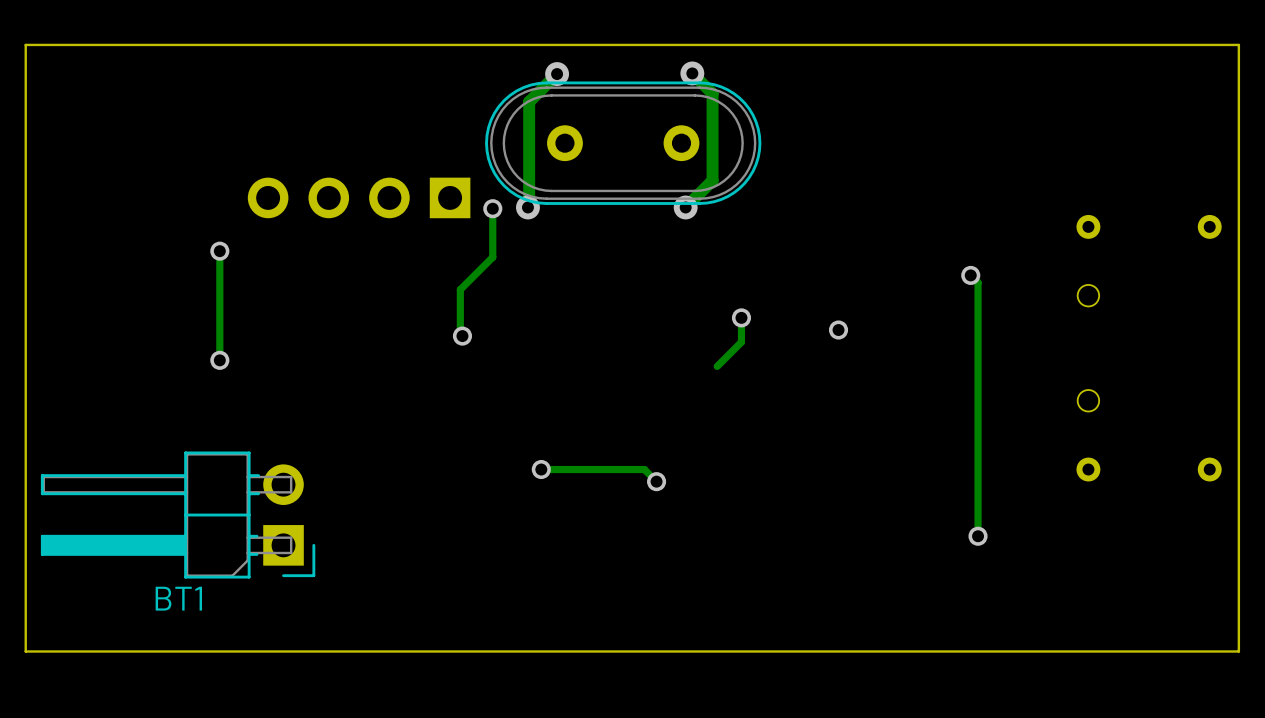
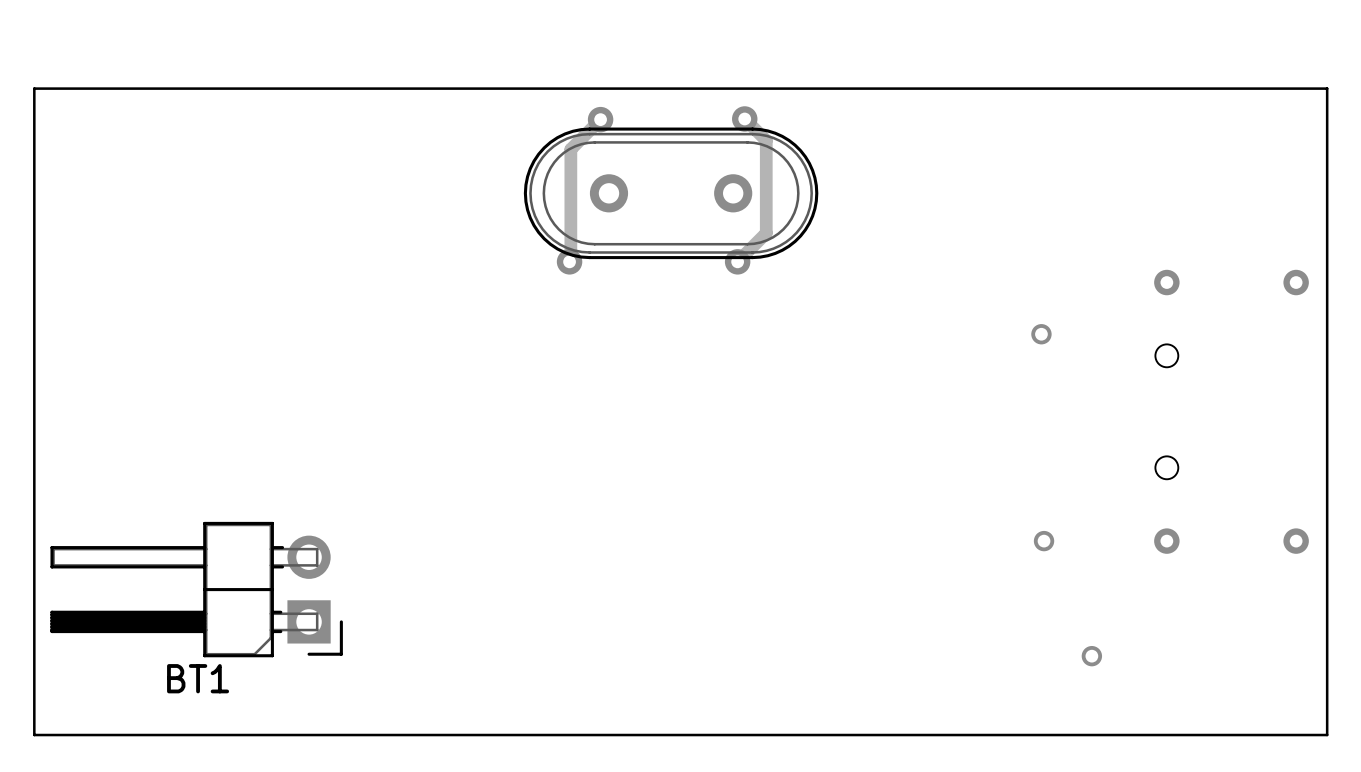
part: (359, 197) -> none
track: (492, 208) (492, 257) (460, 289) (460, 333) (462, 336) -> none
via: (492, 208) -> none
track: (219, 251) (219, 360) -> none
via: (219, 251) -> none
track: (970, 275) (978, 282) (978, 536) -> none
track: (741, 317) (741, 342) (717, 366) -> none
via: (741, 317) -> none
via: (838, 330) -> none
via: (462, 336) -> none
via: (219, 360) -> none
track: (541, 469) (644, 469) (656, 481) -> none
via: (541, 469) -> none
via: none -> (1044, 541)
via: (656, 481) -> none
via: (978, 536) -> none
via: none -> (1091, 656)

